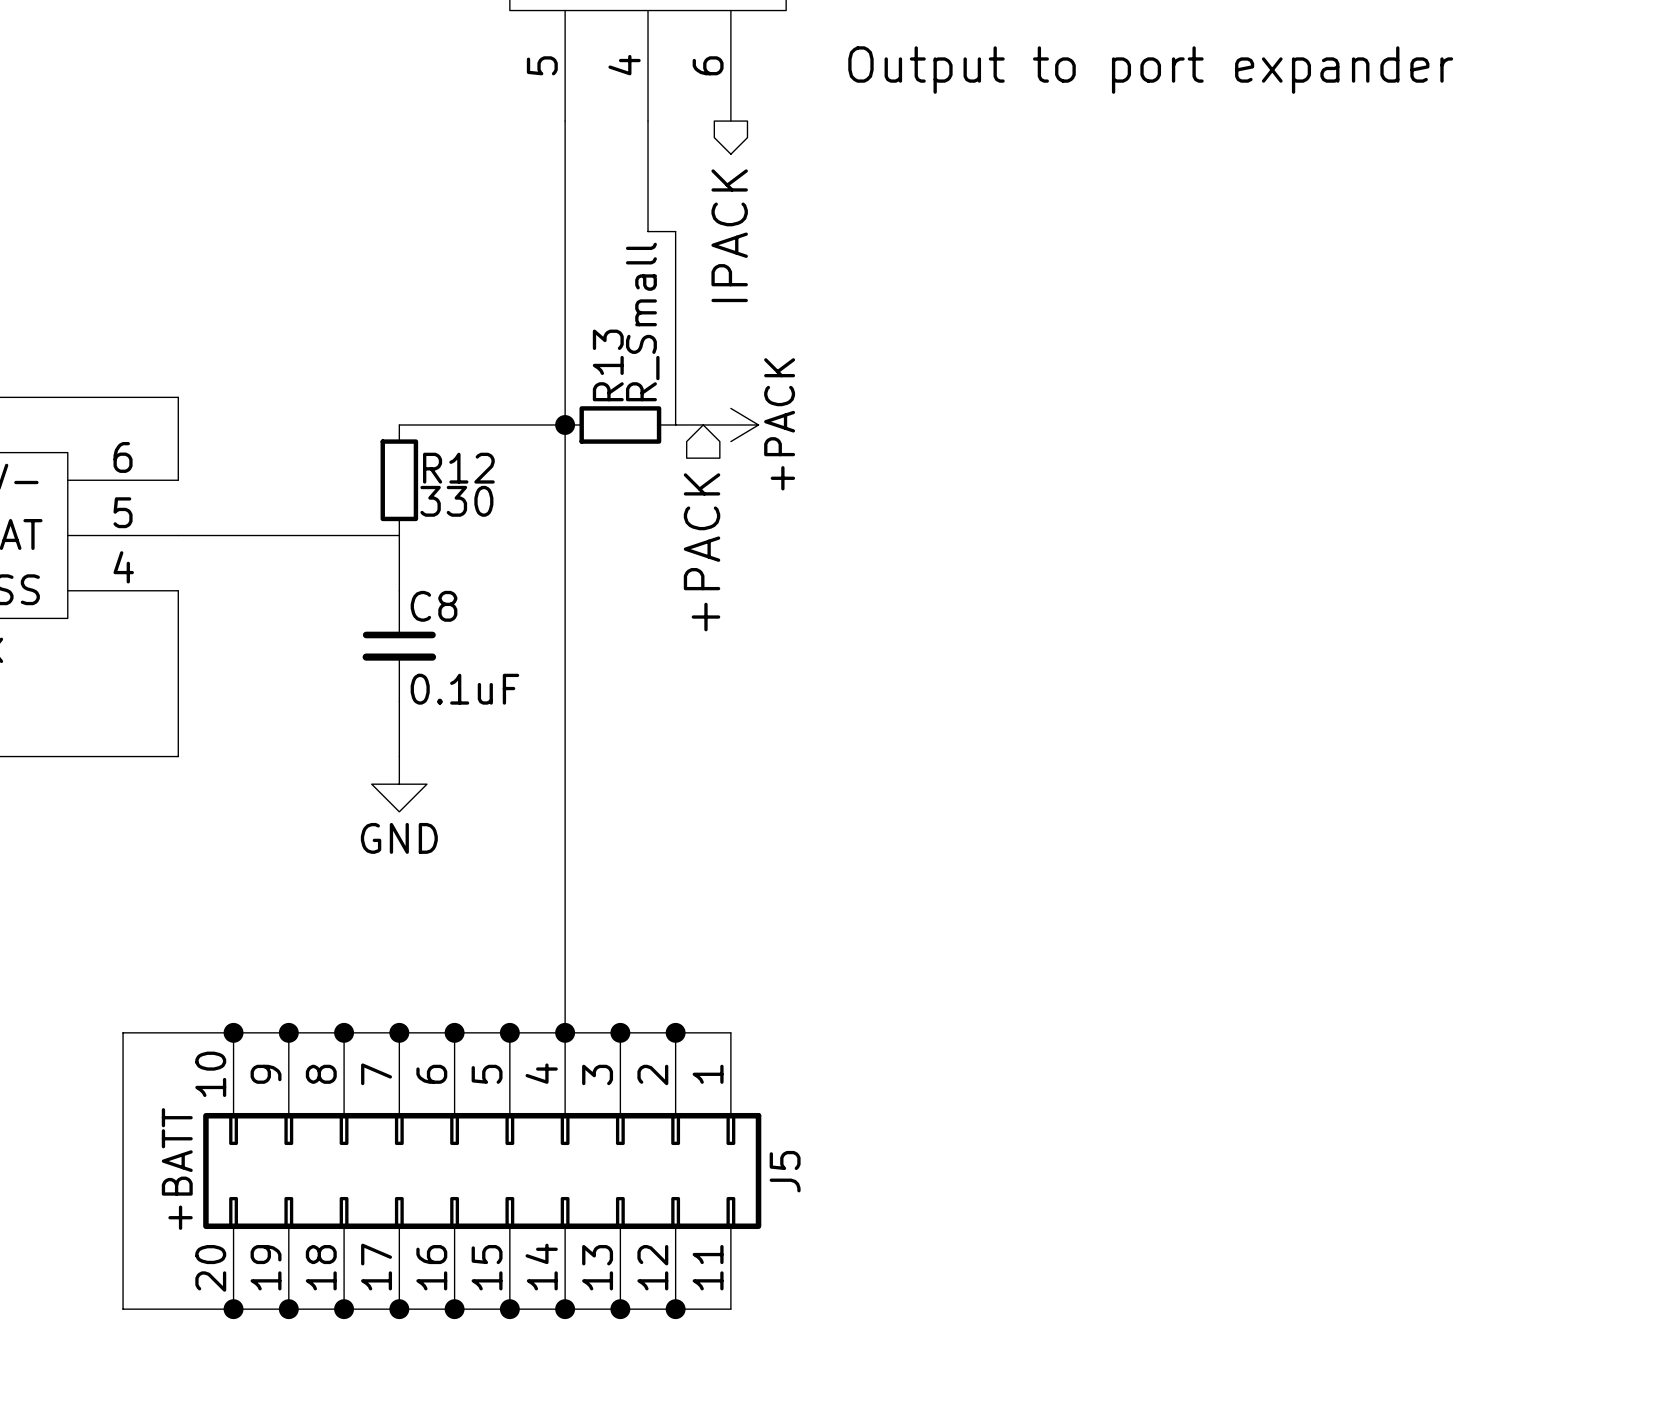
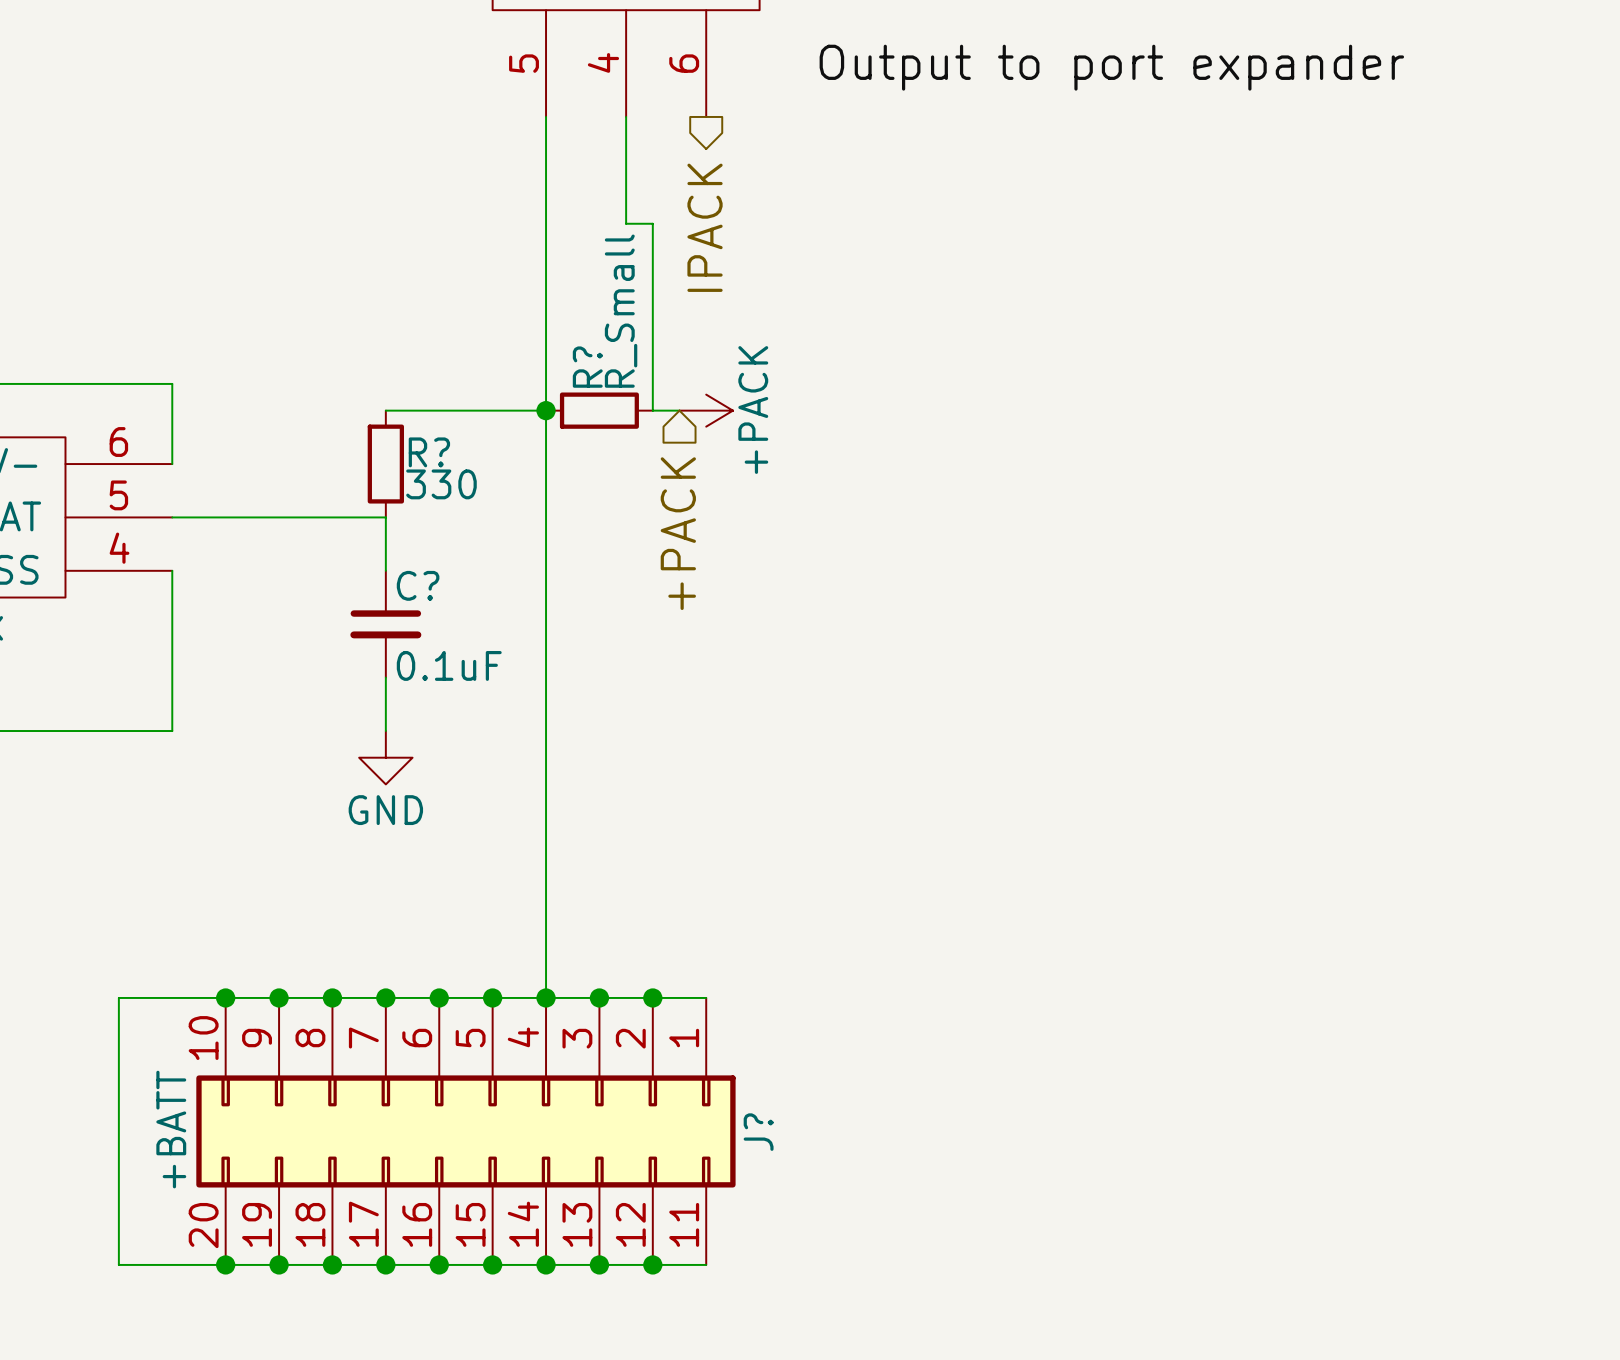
R13 name: R13 (608, 365) -> R? (587, 367)
R12 name: R12 (458, 468) -> R? (429, 452)
C8 name: C8 (434, 606) -> C? (418, 585)
J5 name: J5 (785, 1171) -> J? (758, 1132)

